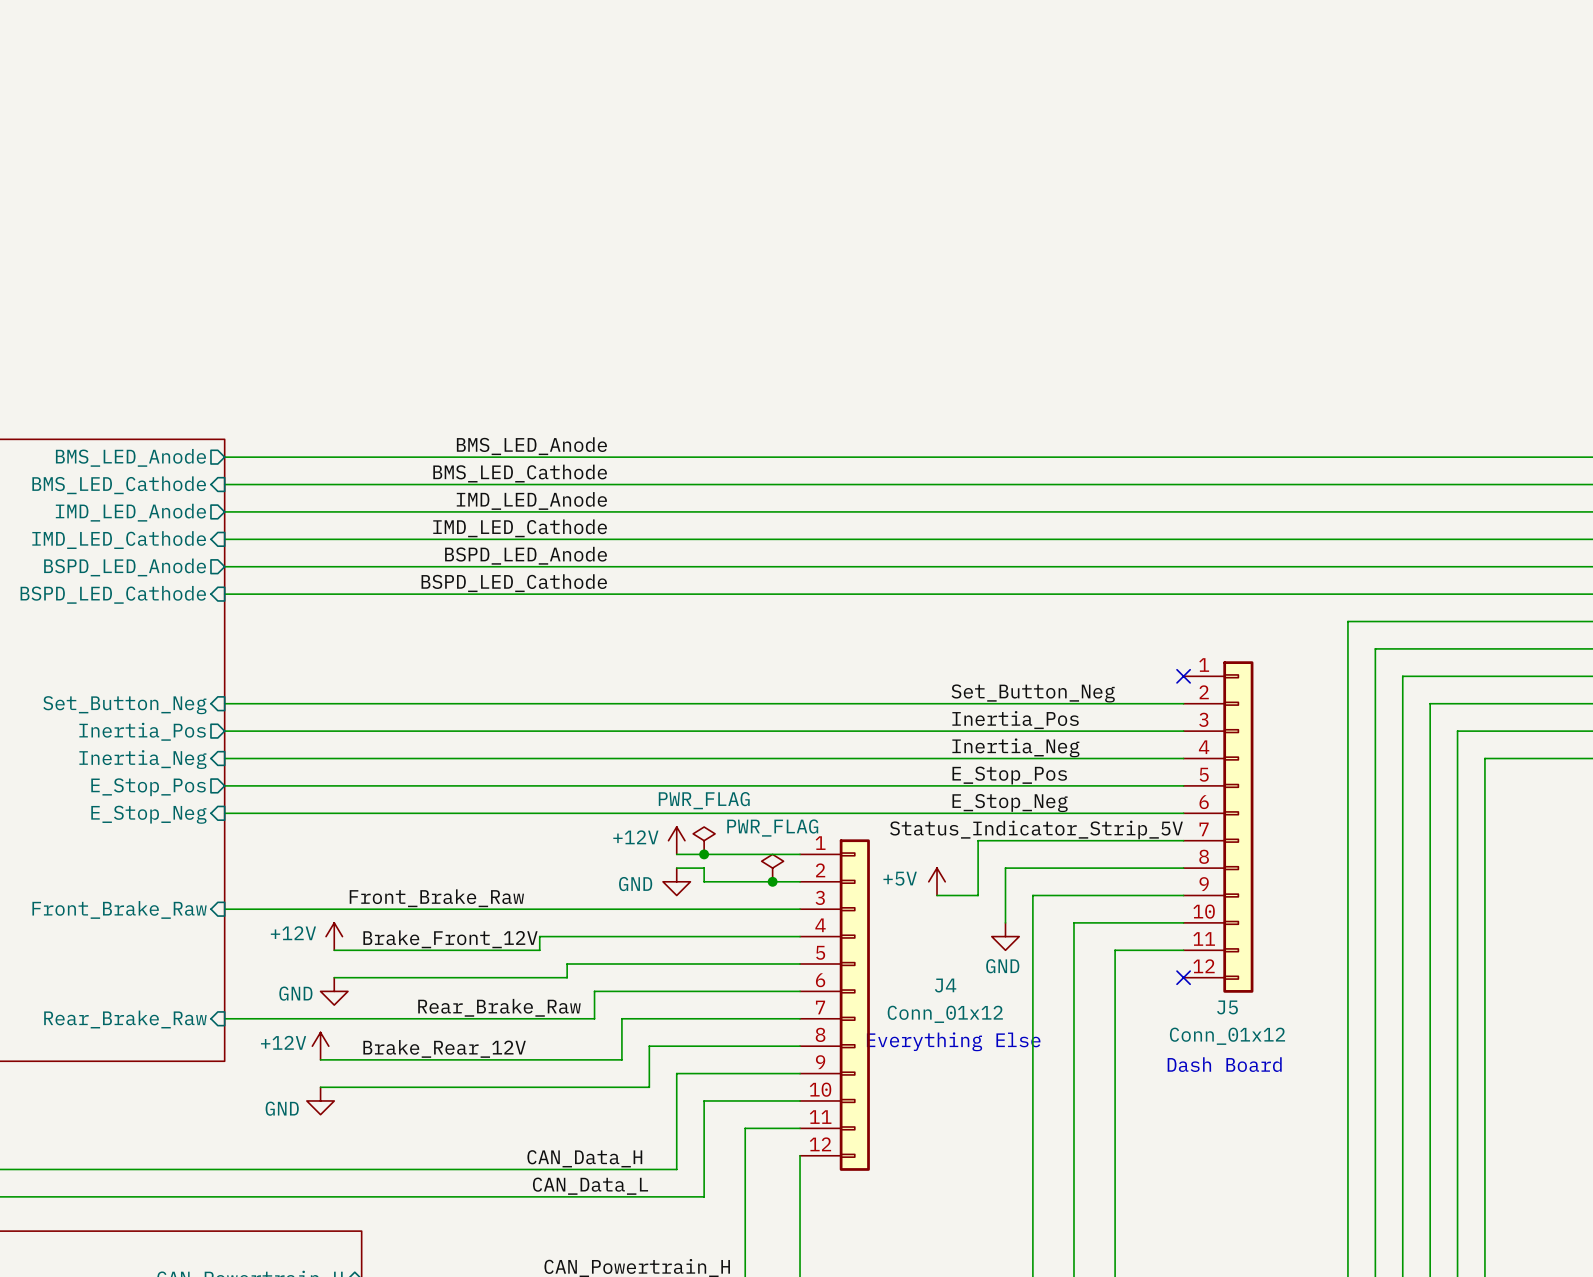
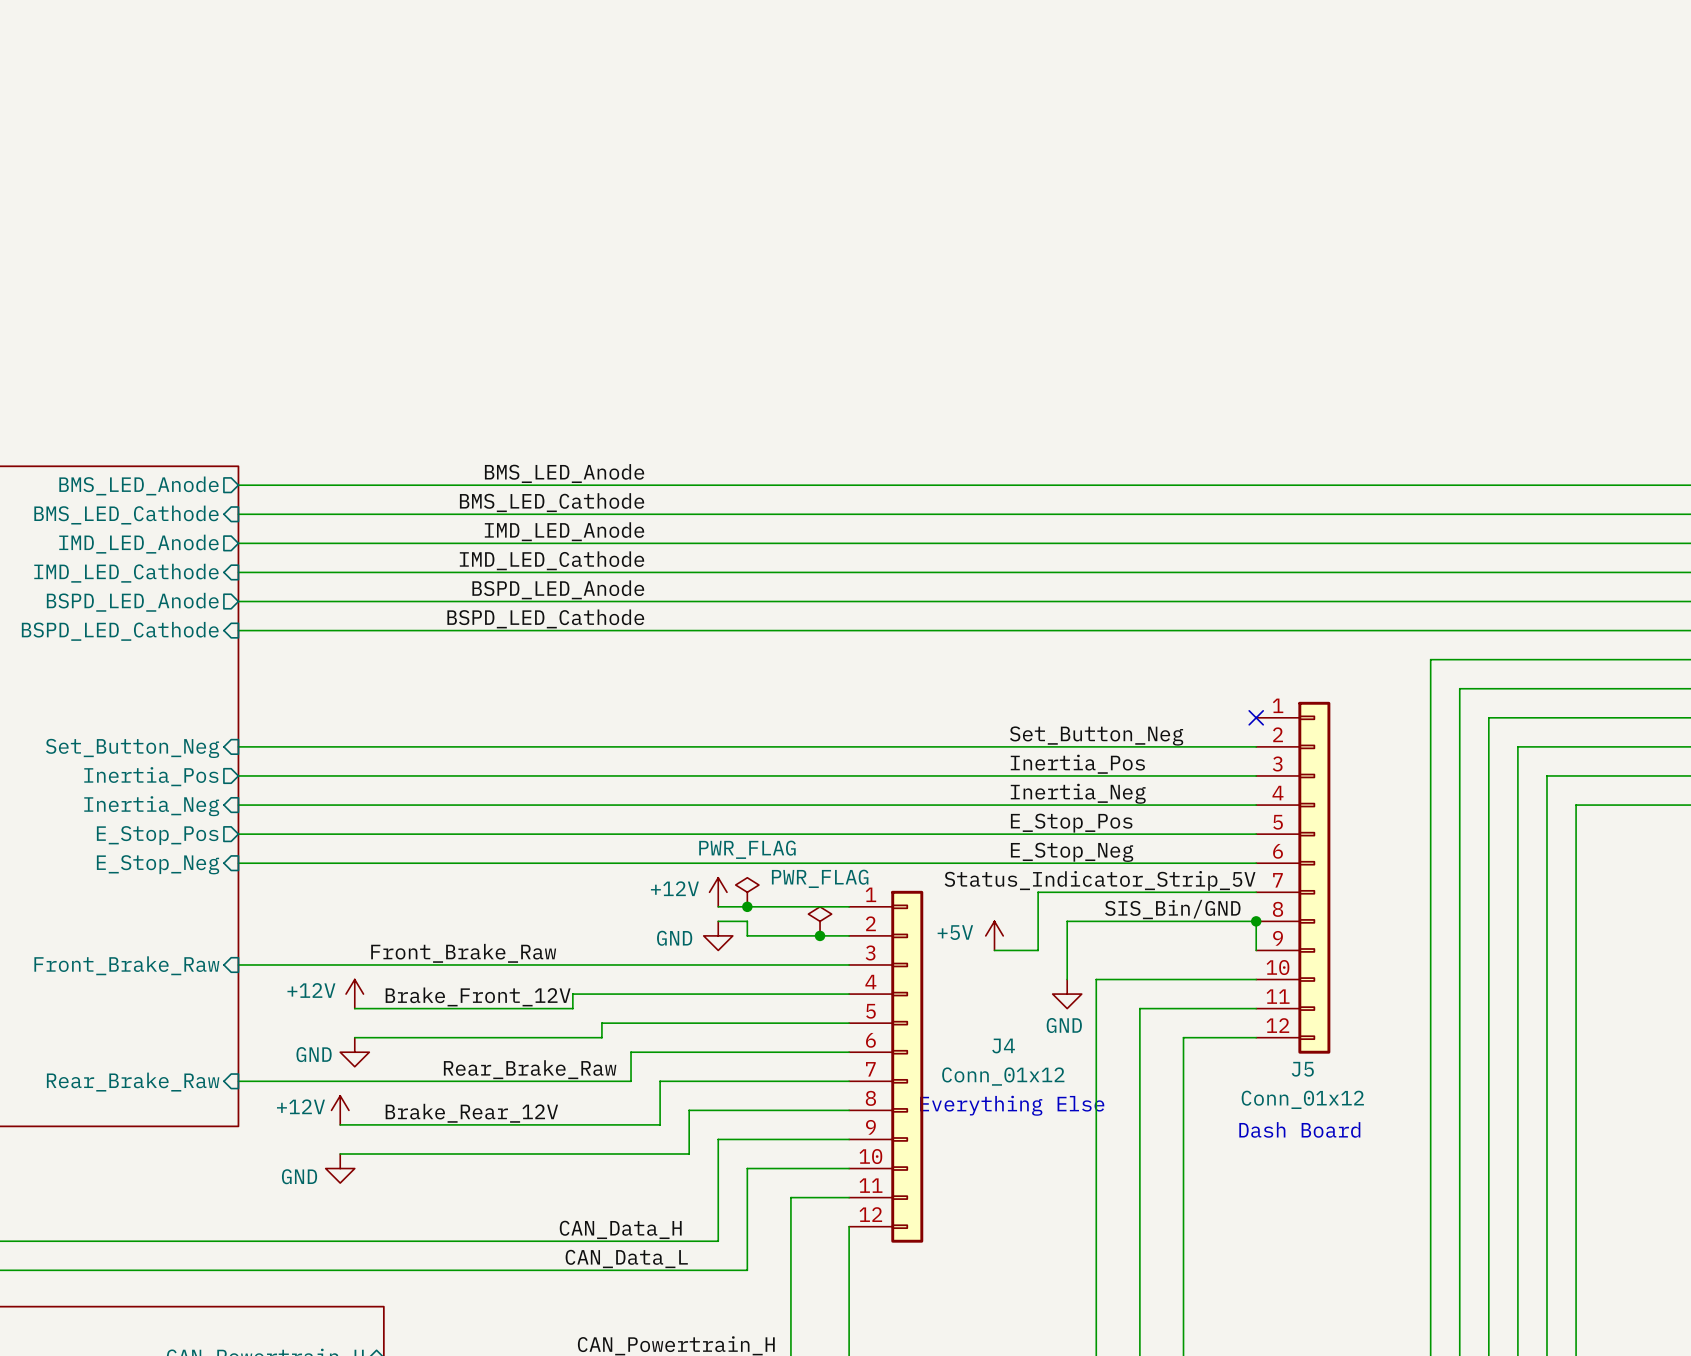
label: none -> SIS_Bin/GND (1172, 909)
junction: none -> (1256, 921)
wire: (1183, 895) (1032, 895) (1032, 922) -> (1256, 950) (1256, 921)
wire: (1073, 922) (1073, 950) -> (1139, 979) (1096, 979)
wire: (1115, 950) (1115, 977) -> (1183, 1008) (1139, 1008)
wire: none -> (1183, 1037) (1256, 1037)
no-connect mark: (1183, 977) -> none

